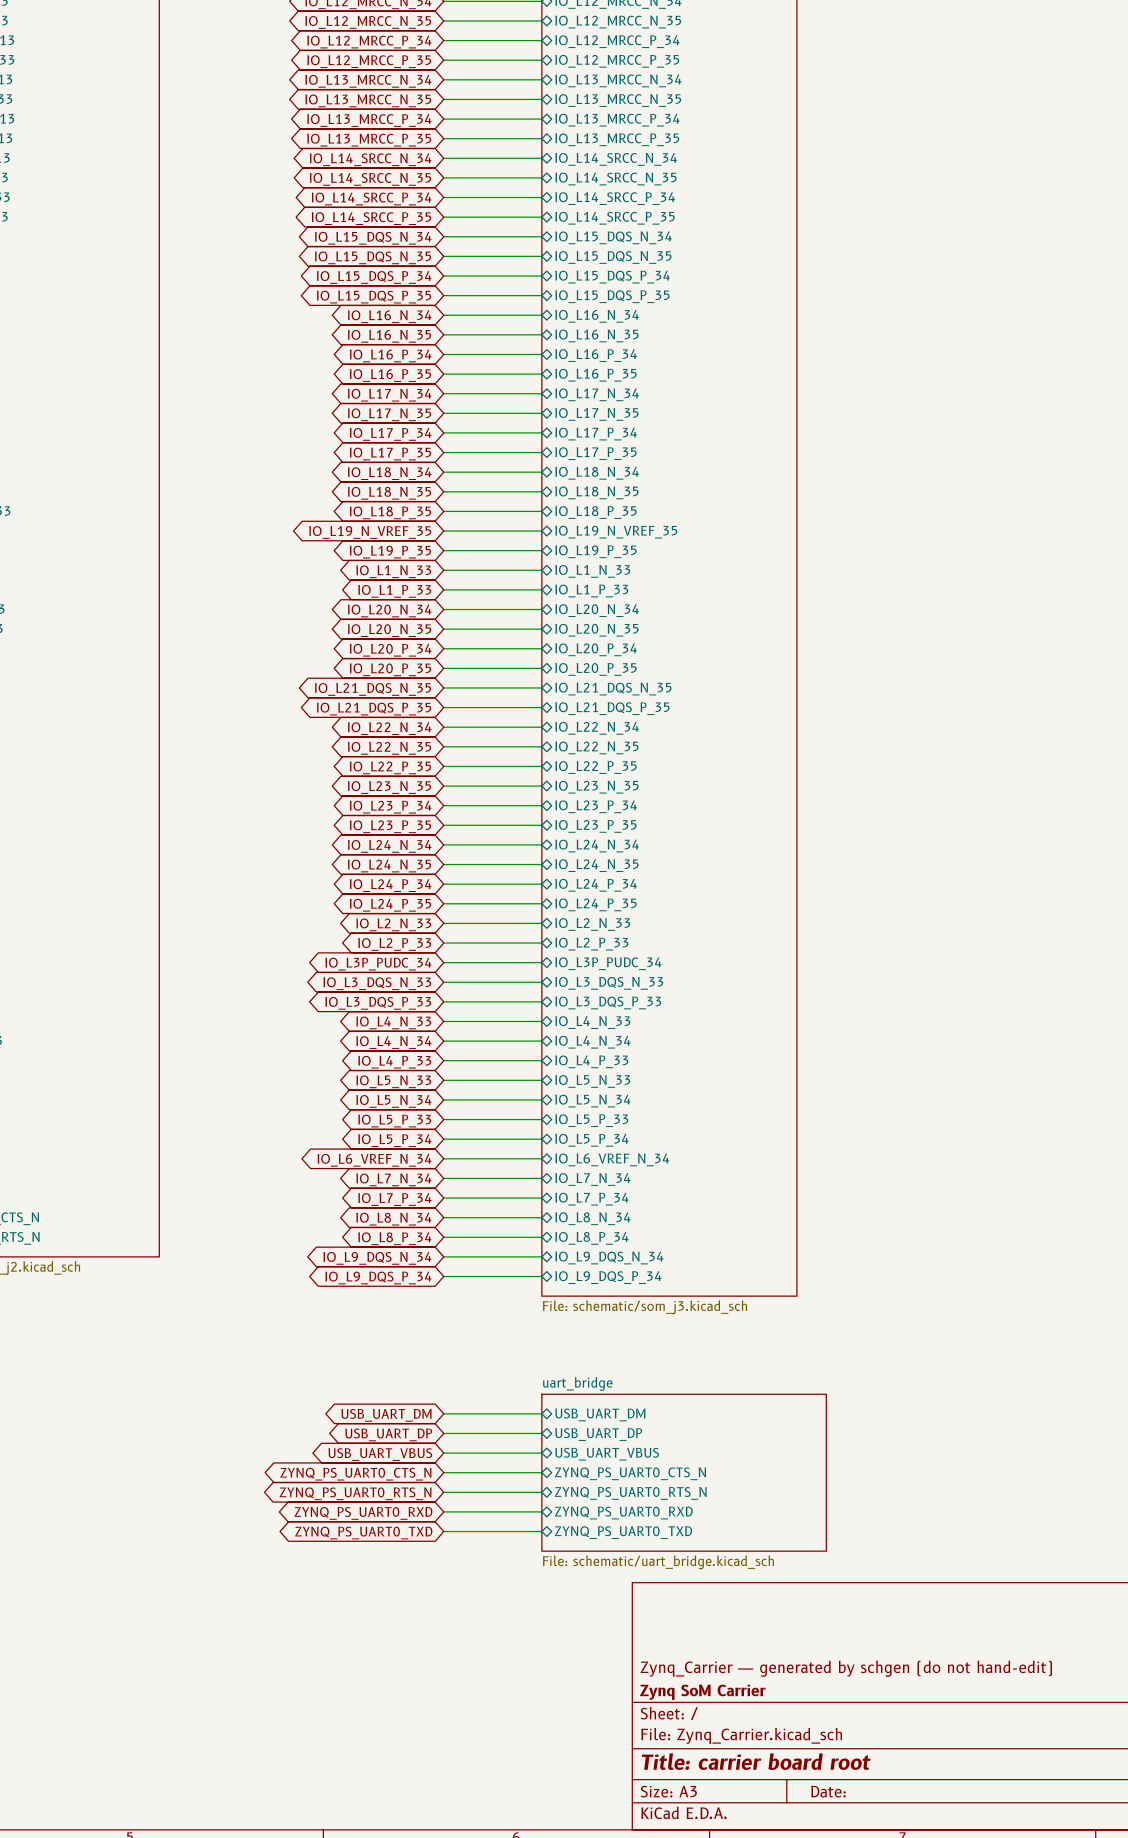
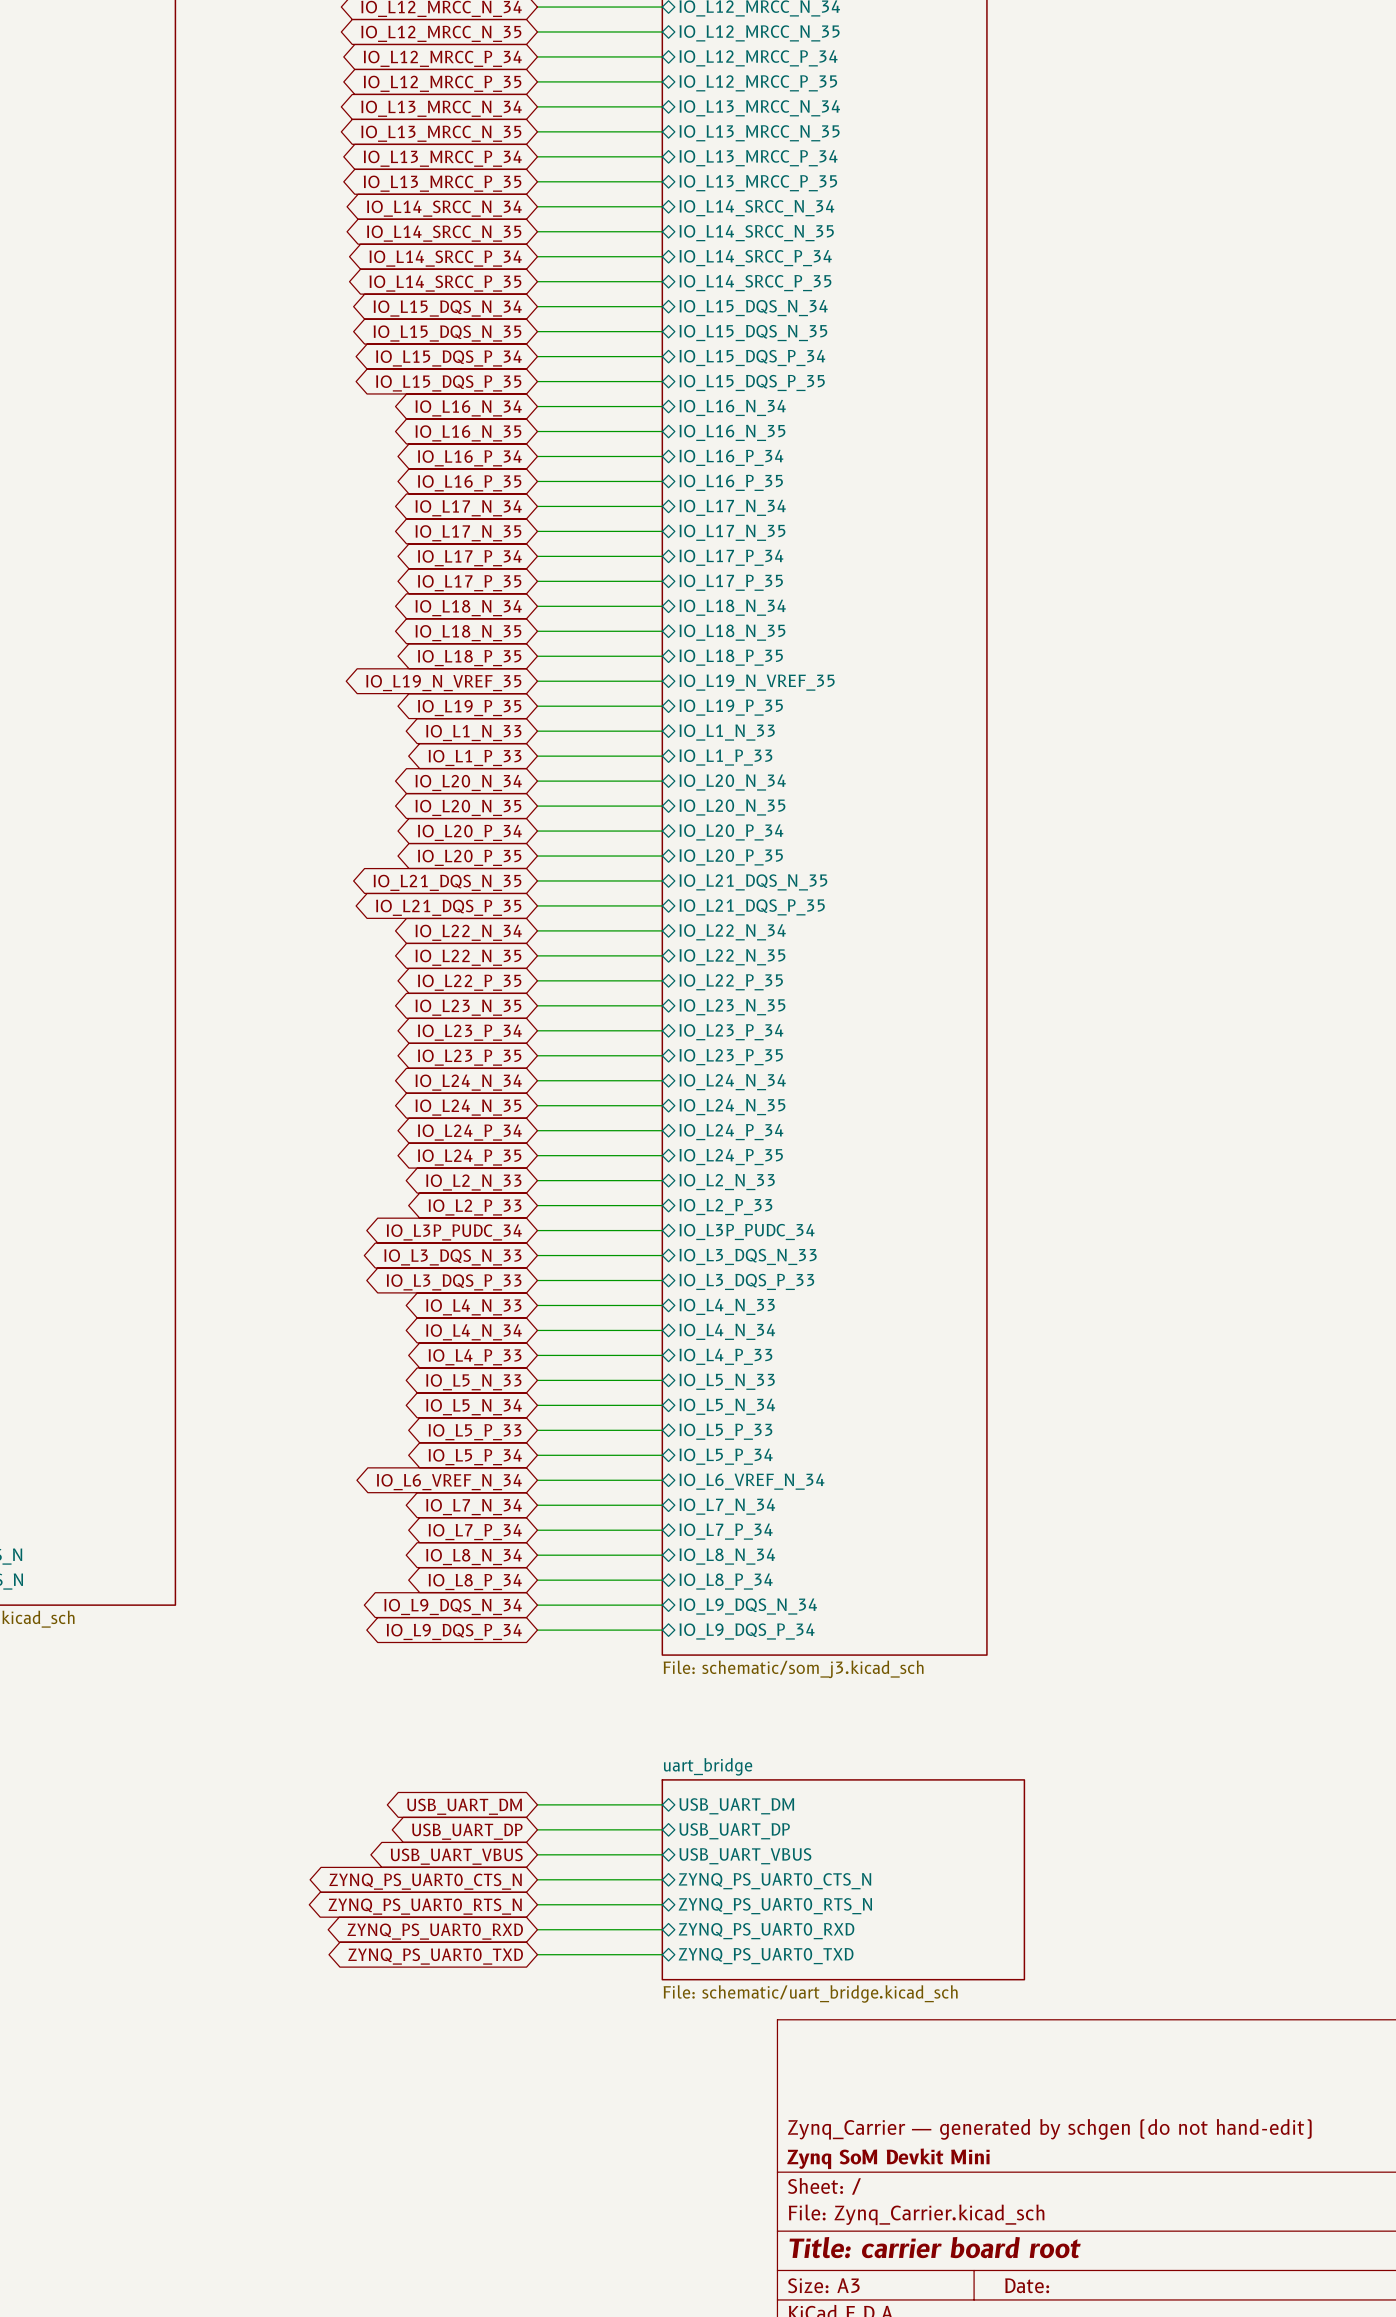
title block: Zynq SoM Carrier (702, 1692) -> Zynq SoM Devkit Mini (888, 2158)

